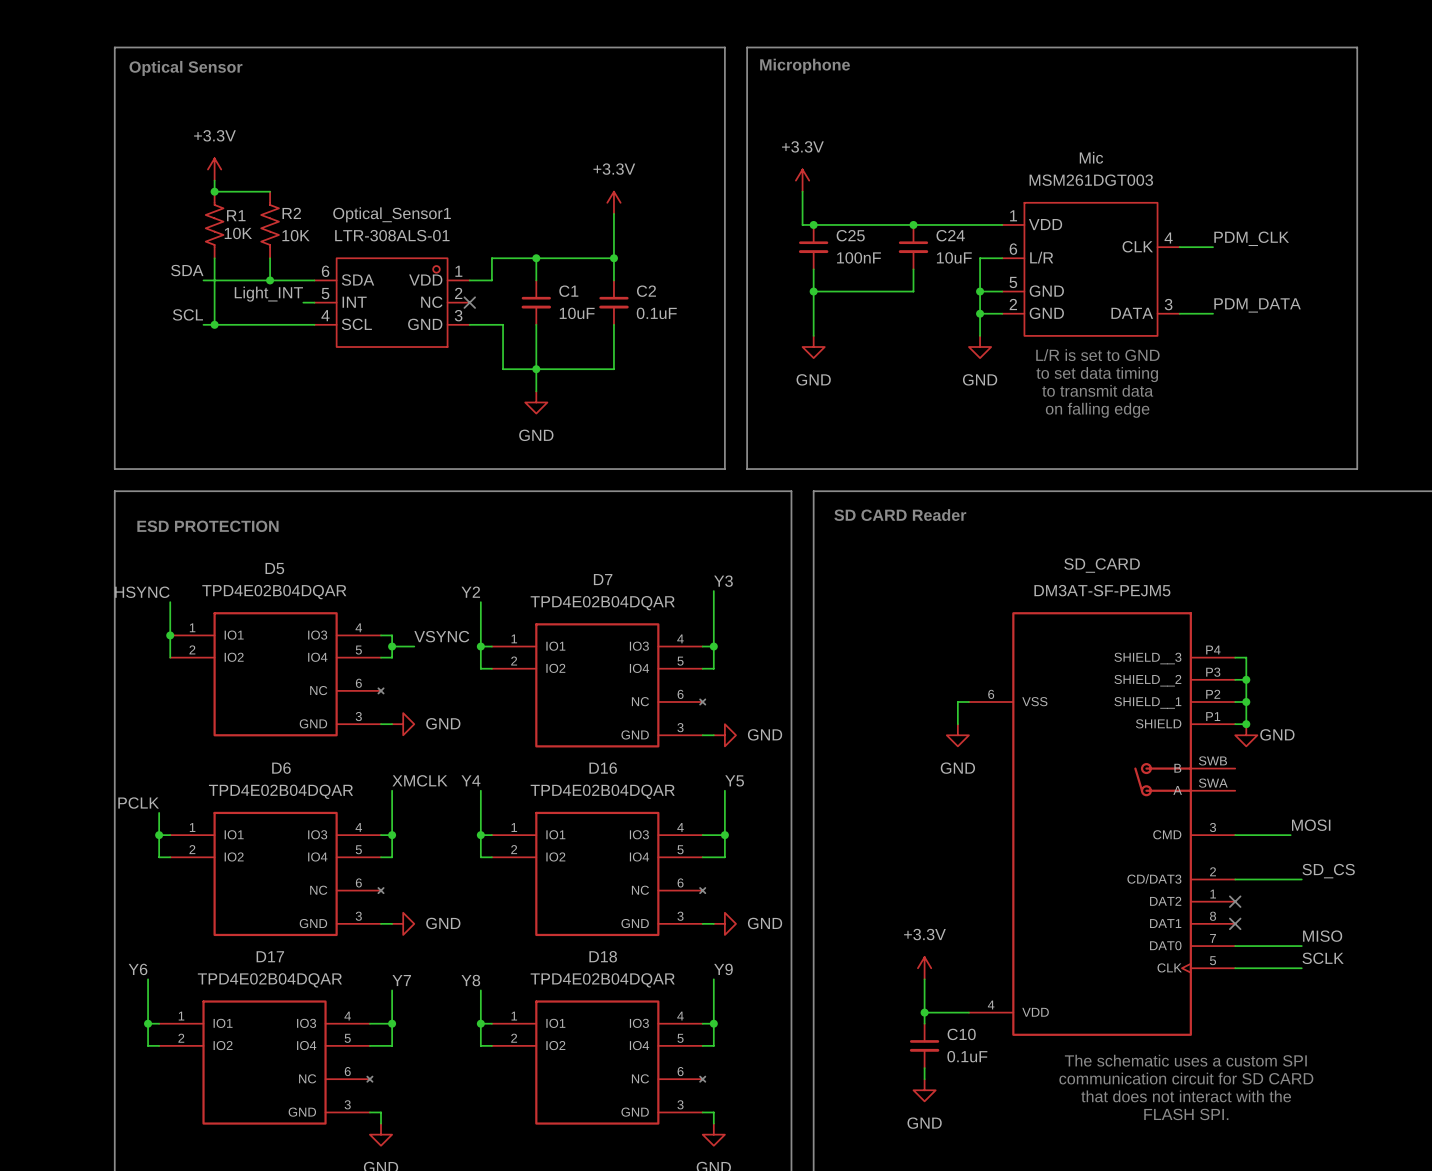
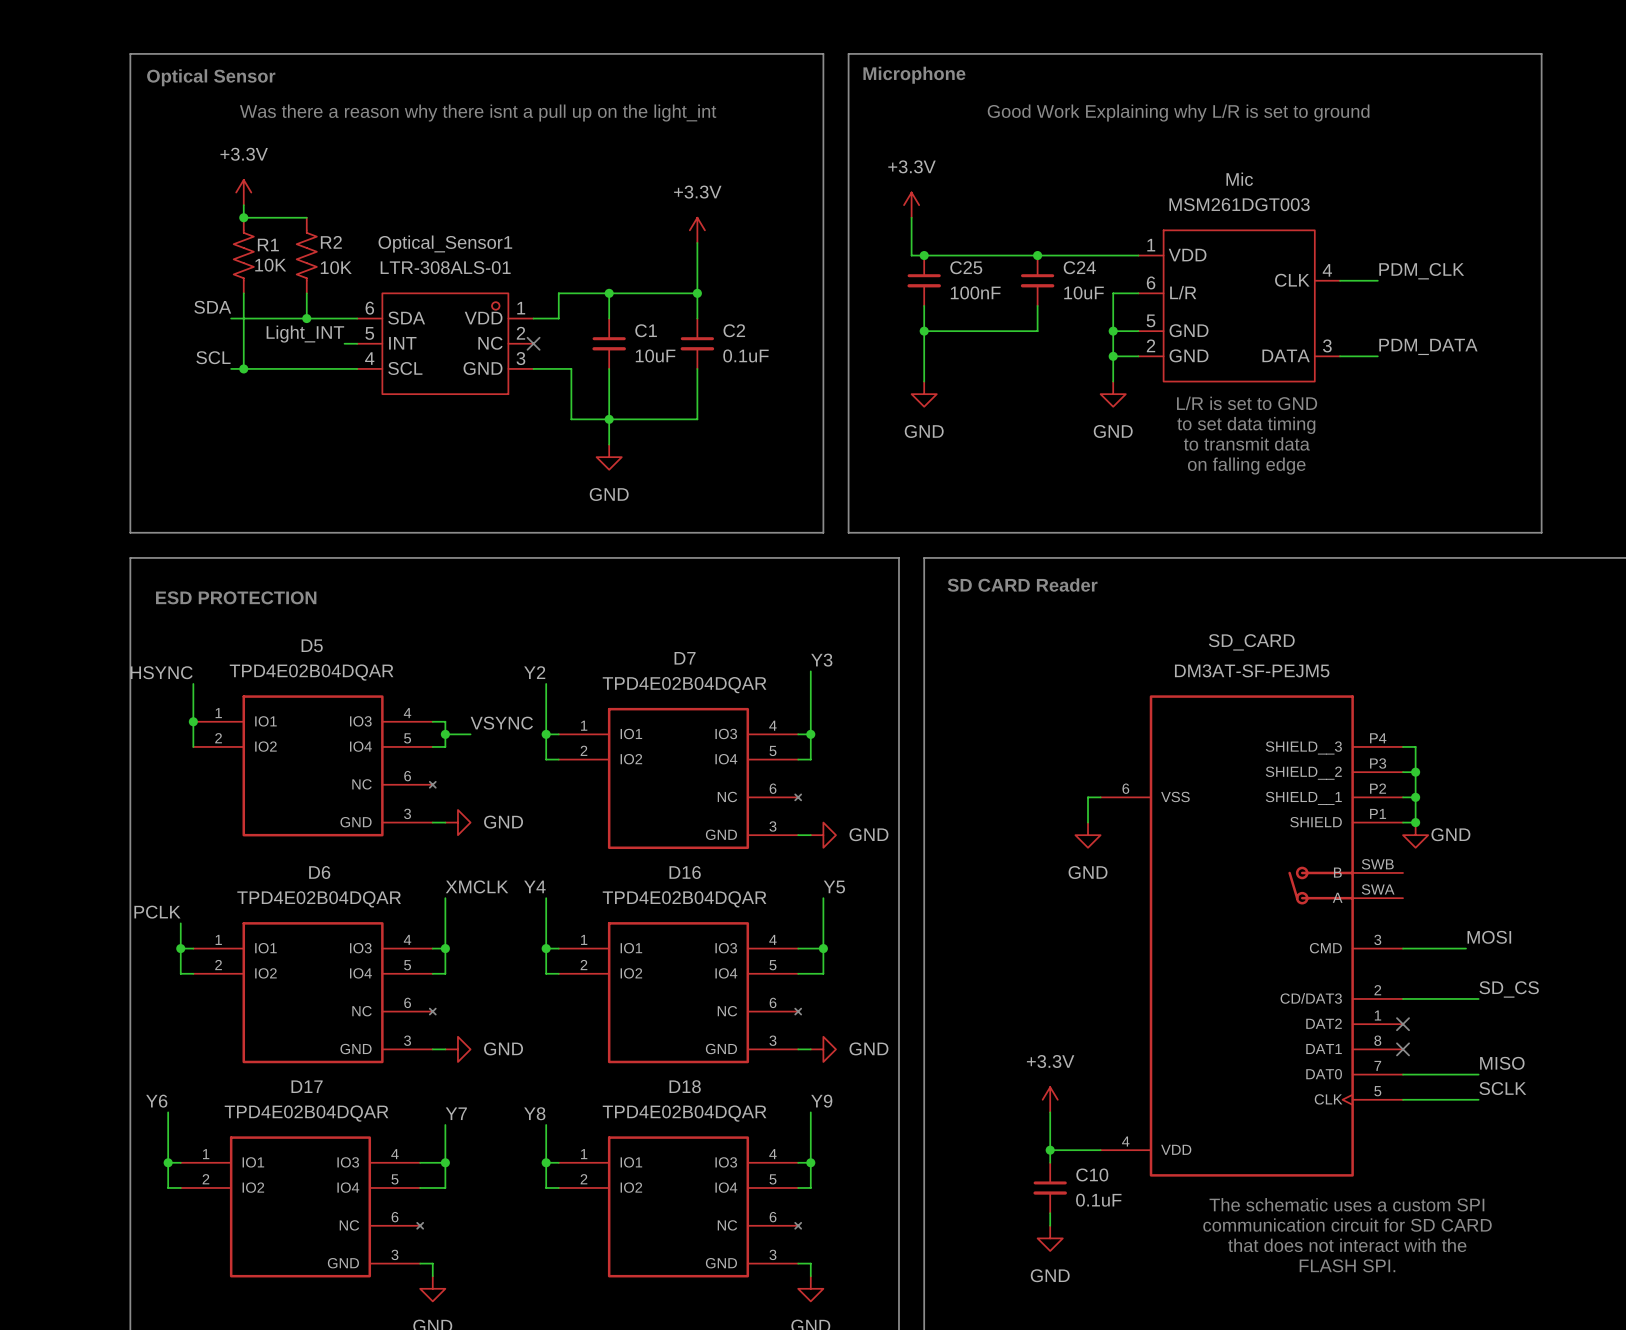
text: none -> Was there a reason why there isnt a pull up on the light_int (478, 113)
text: none -> Good Work Explaining why L/R is set to ground (1178, 113)

